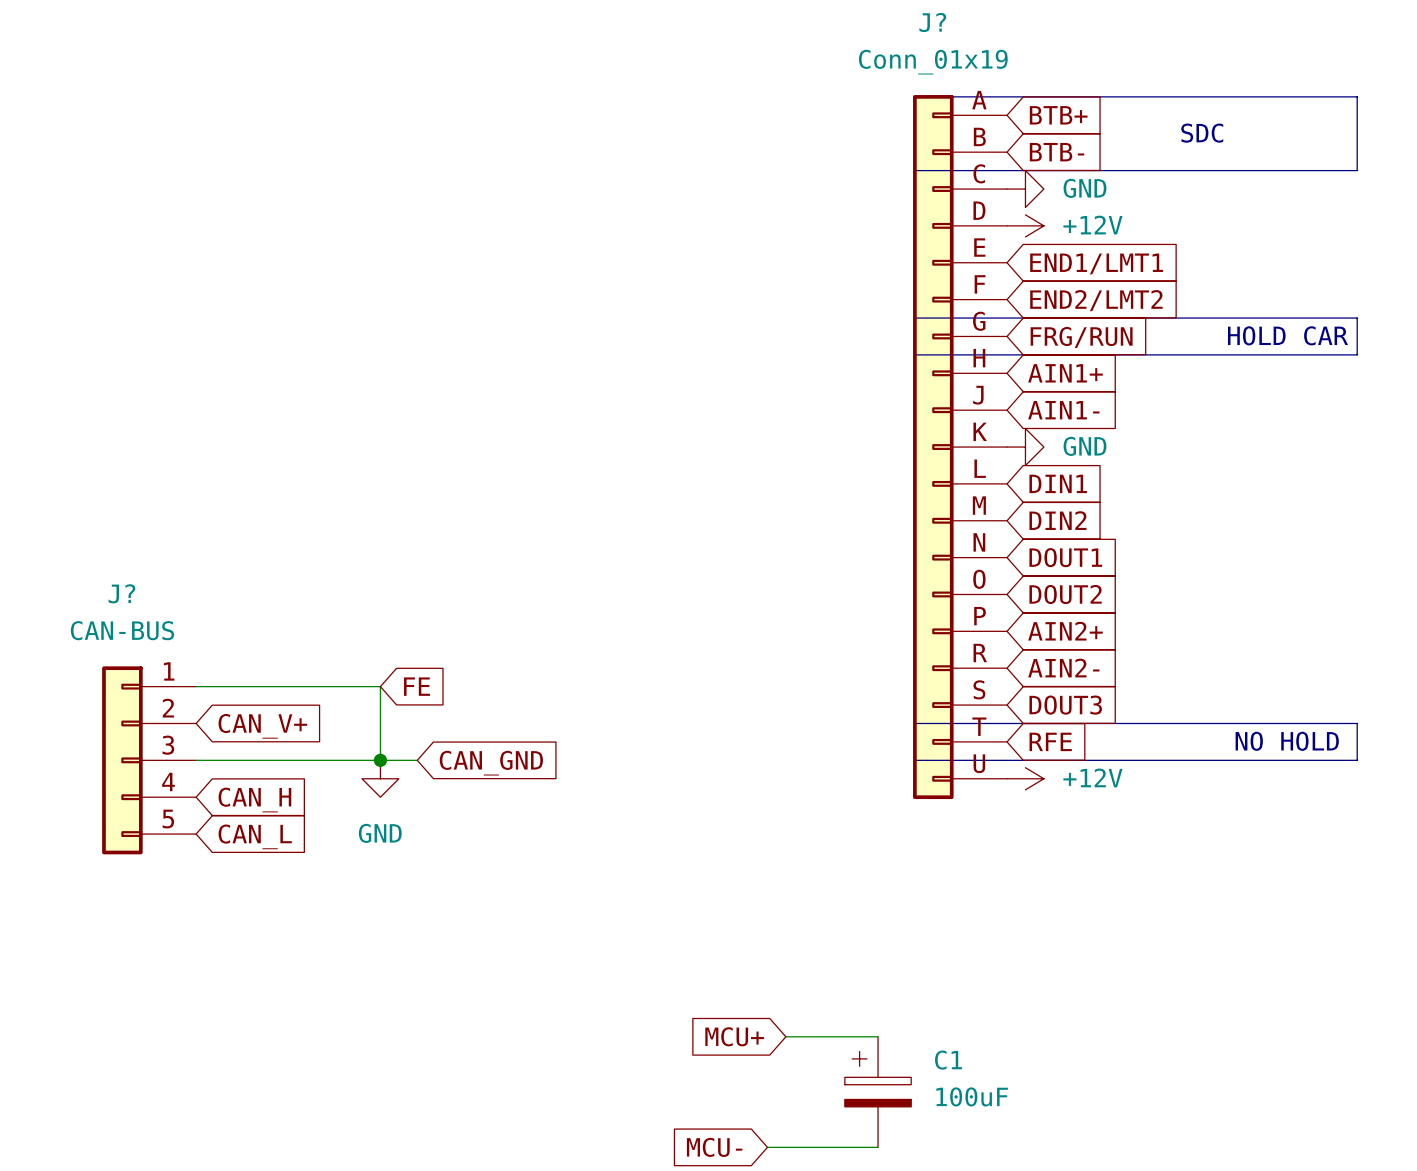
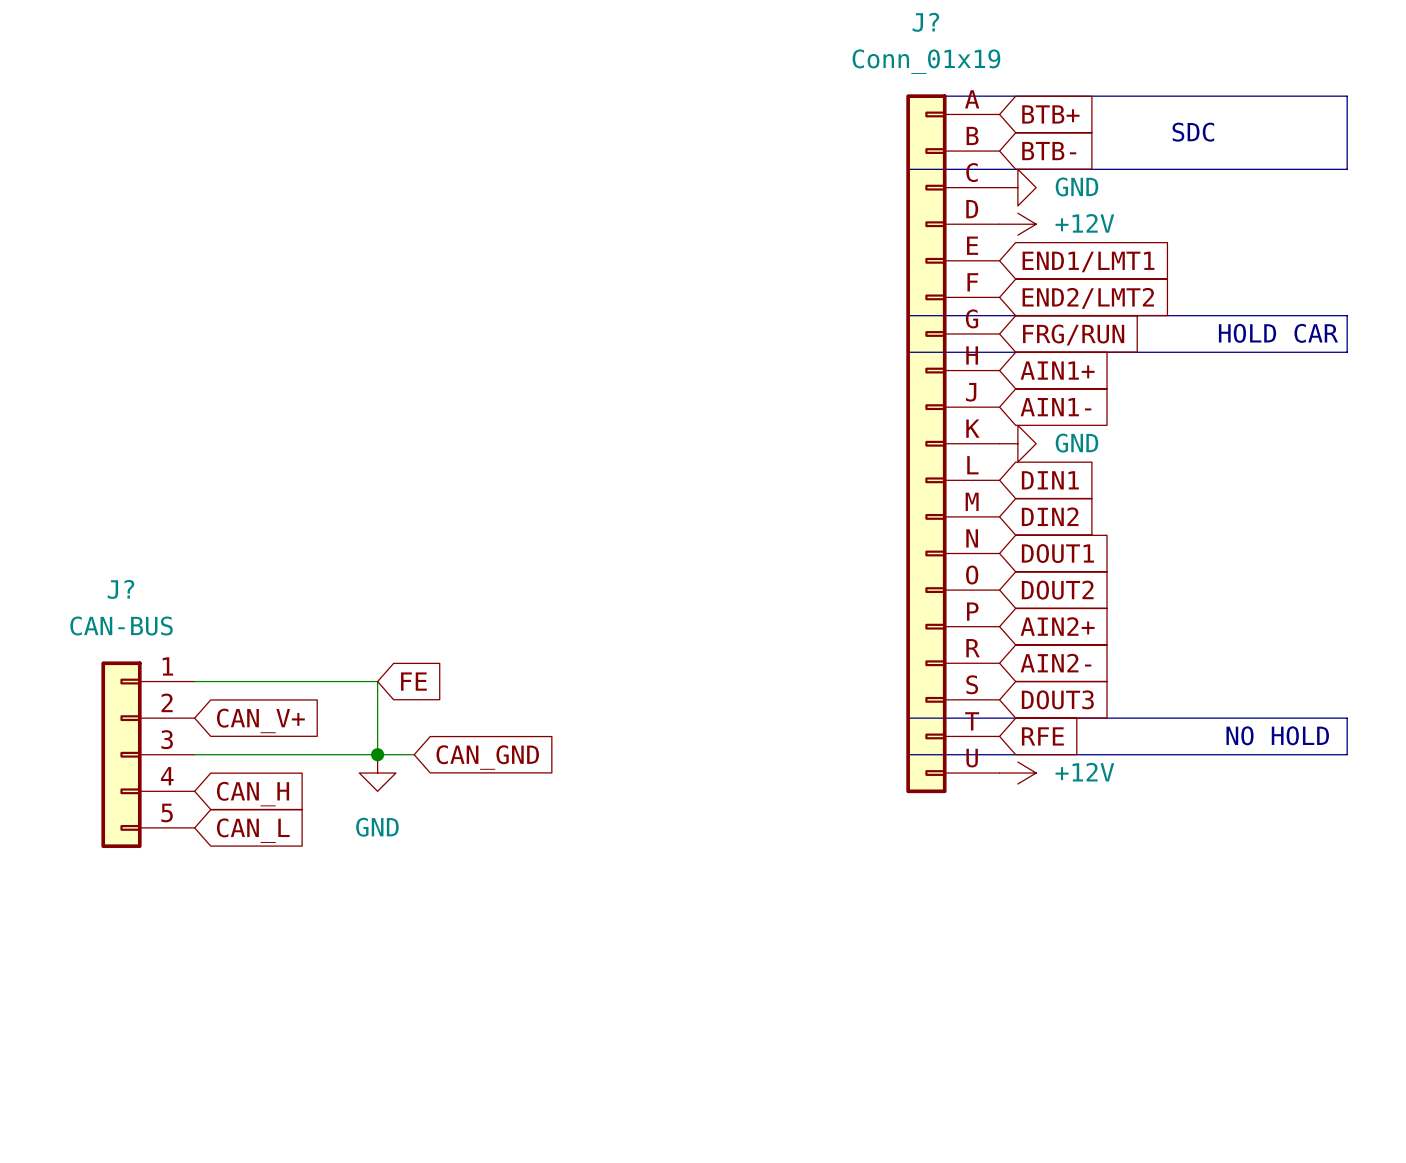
global label: MCU+ (734, 1036) -> none
wire: (785, 1036) (878, 1036) -> none
C1: 100uF (878, 1092) -> none
global label: MCU- (714, 1147) -> none
wire: (767, 1147) (878, 1147) -> none

